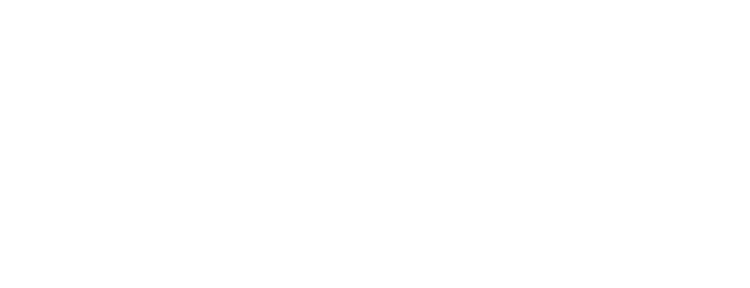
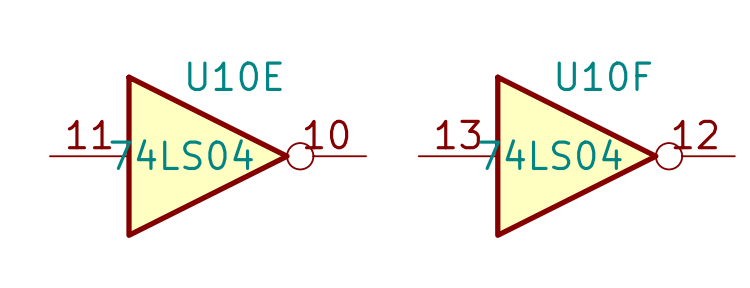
U10E: none -> 74LS04 (208, 156)
U10F: none -> 74LS04 (576, 156)

